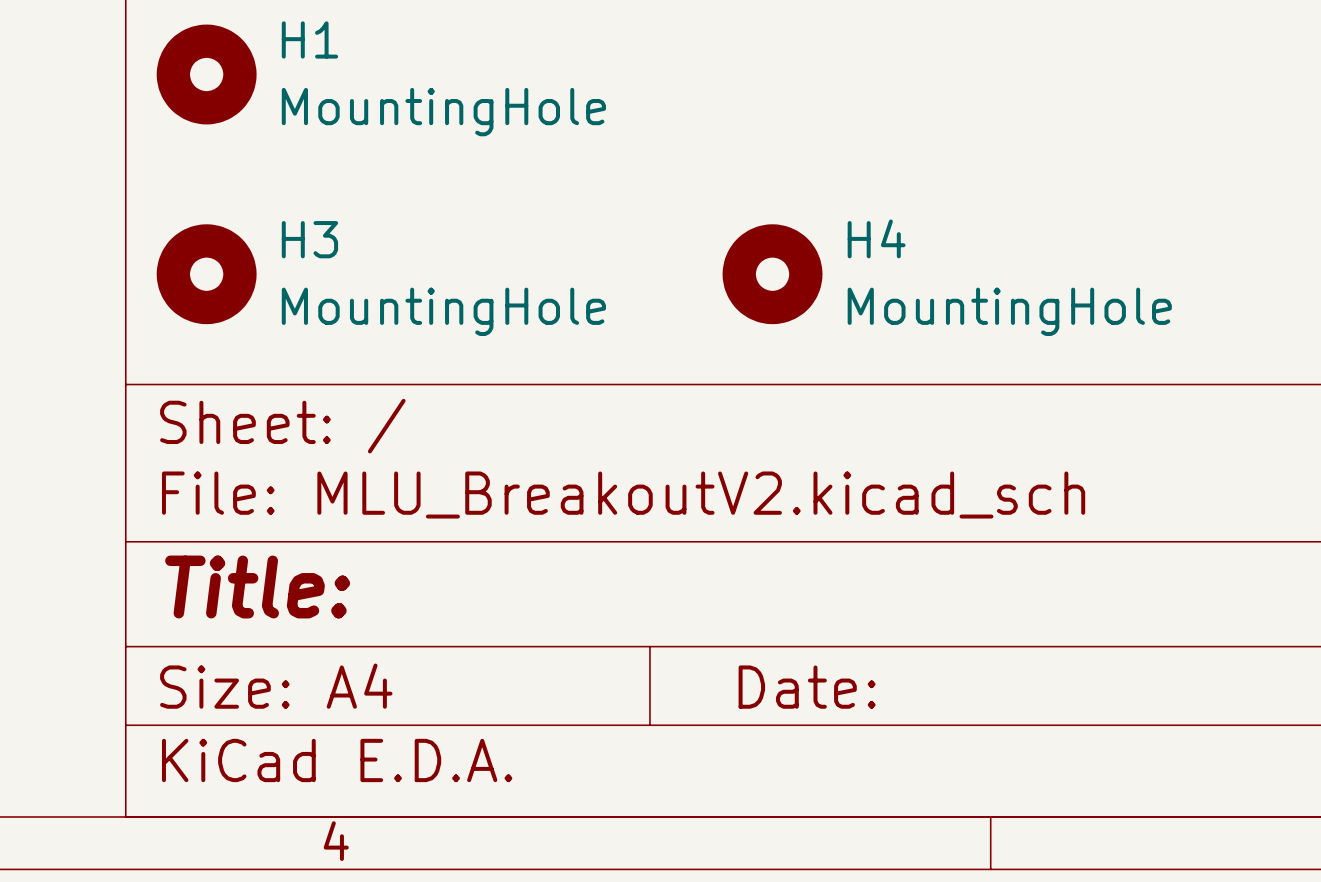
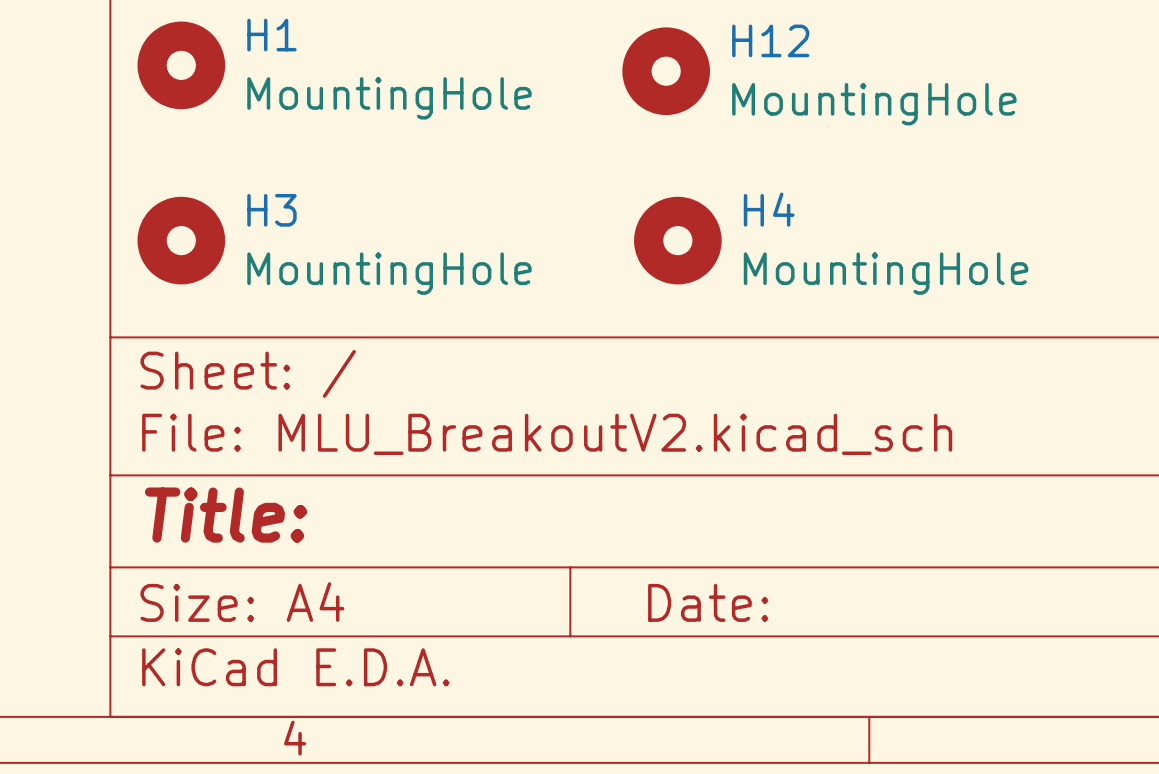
H12: none -> MountingHole (666, 71)

